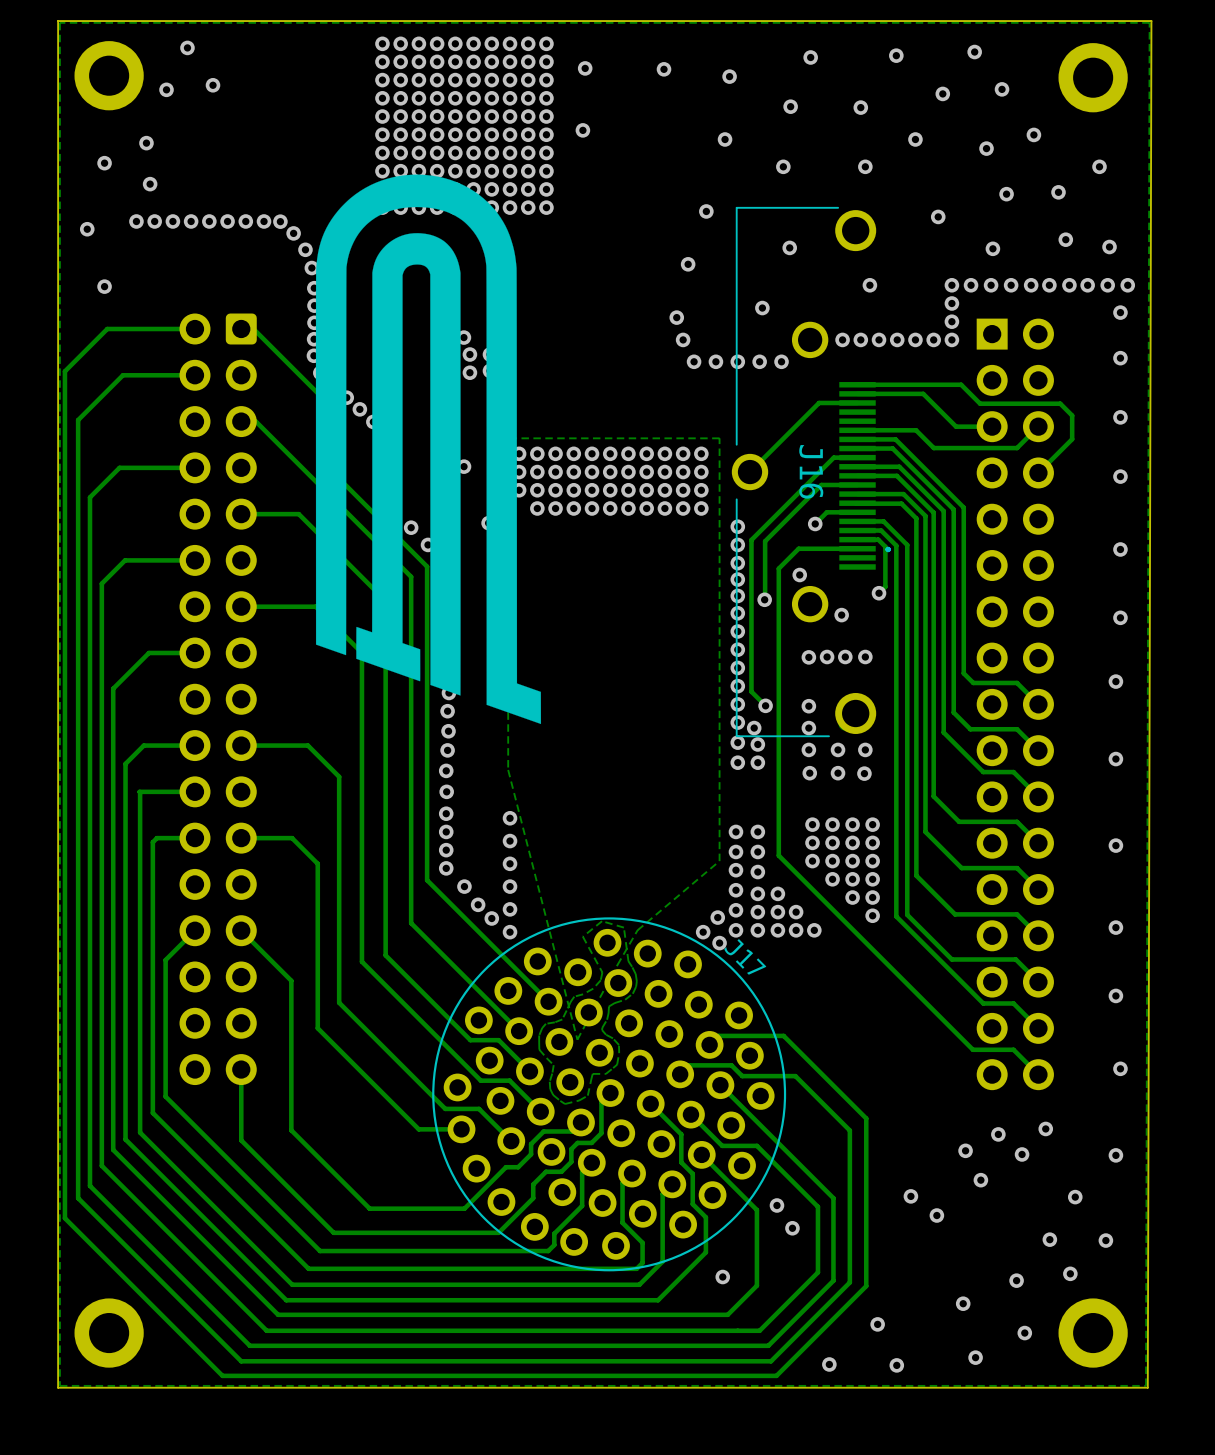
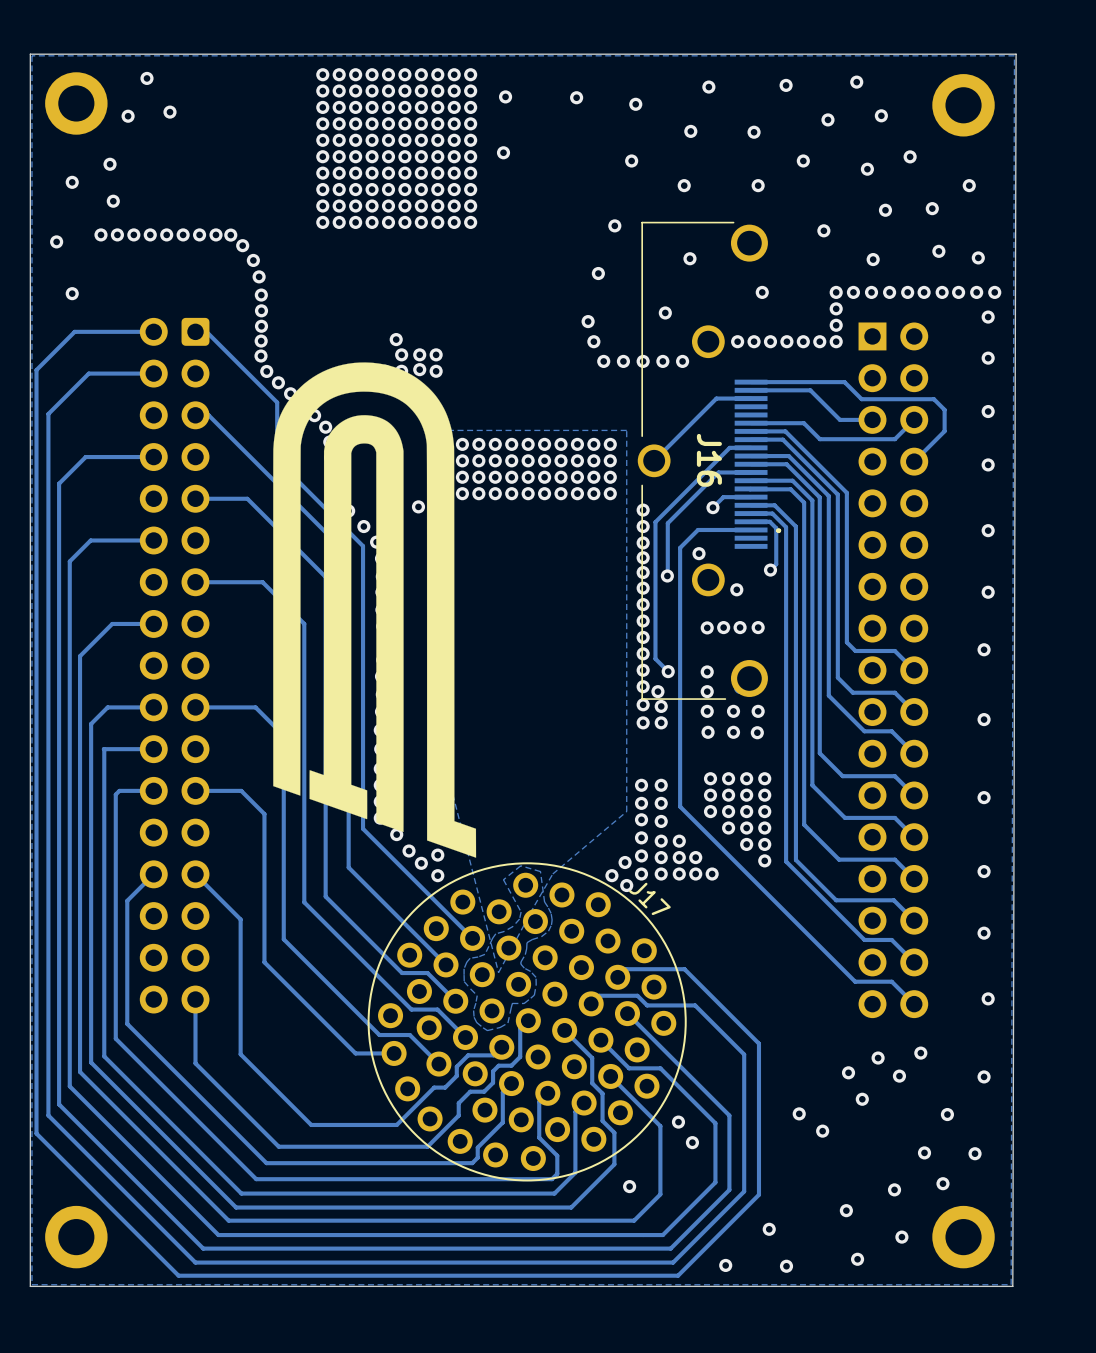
drawing position: (428, 449) -> (374, 610)
via: (464, 466) -> none

